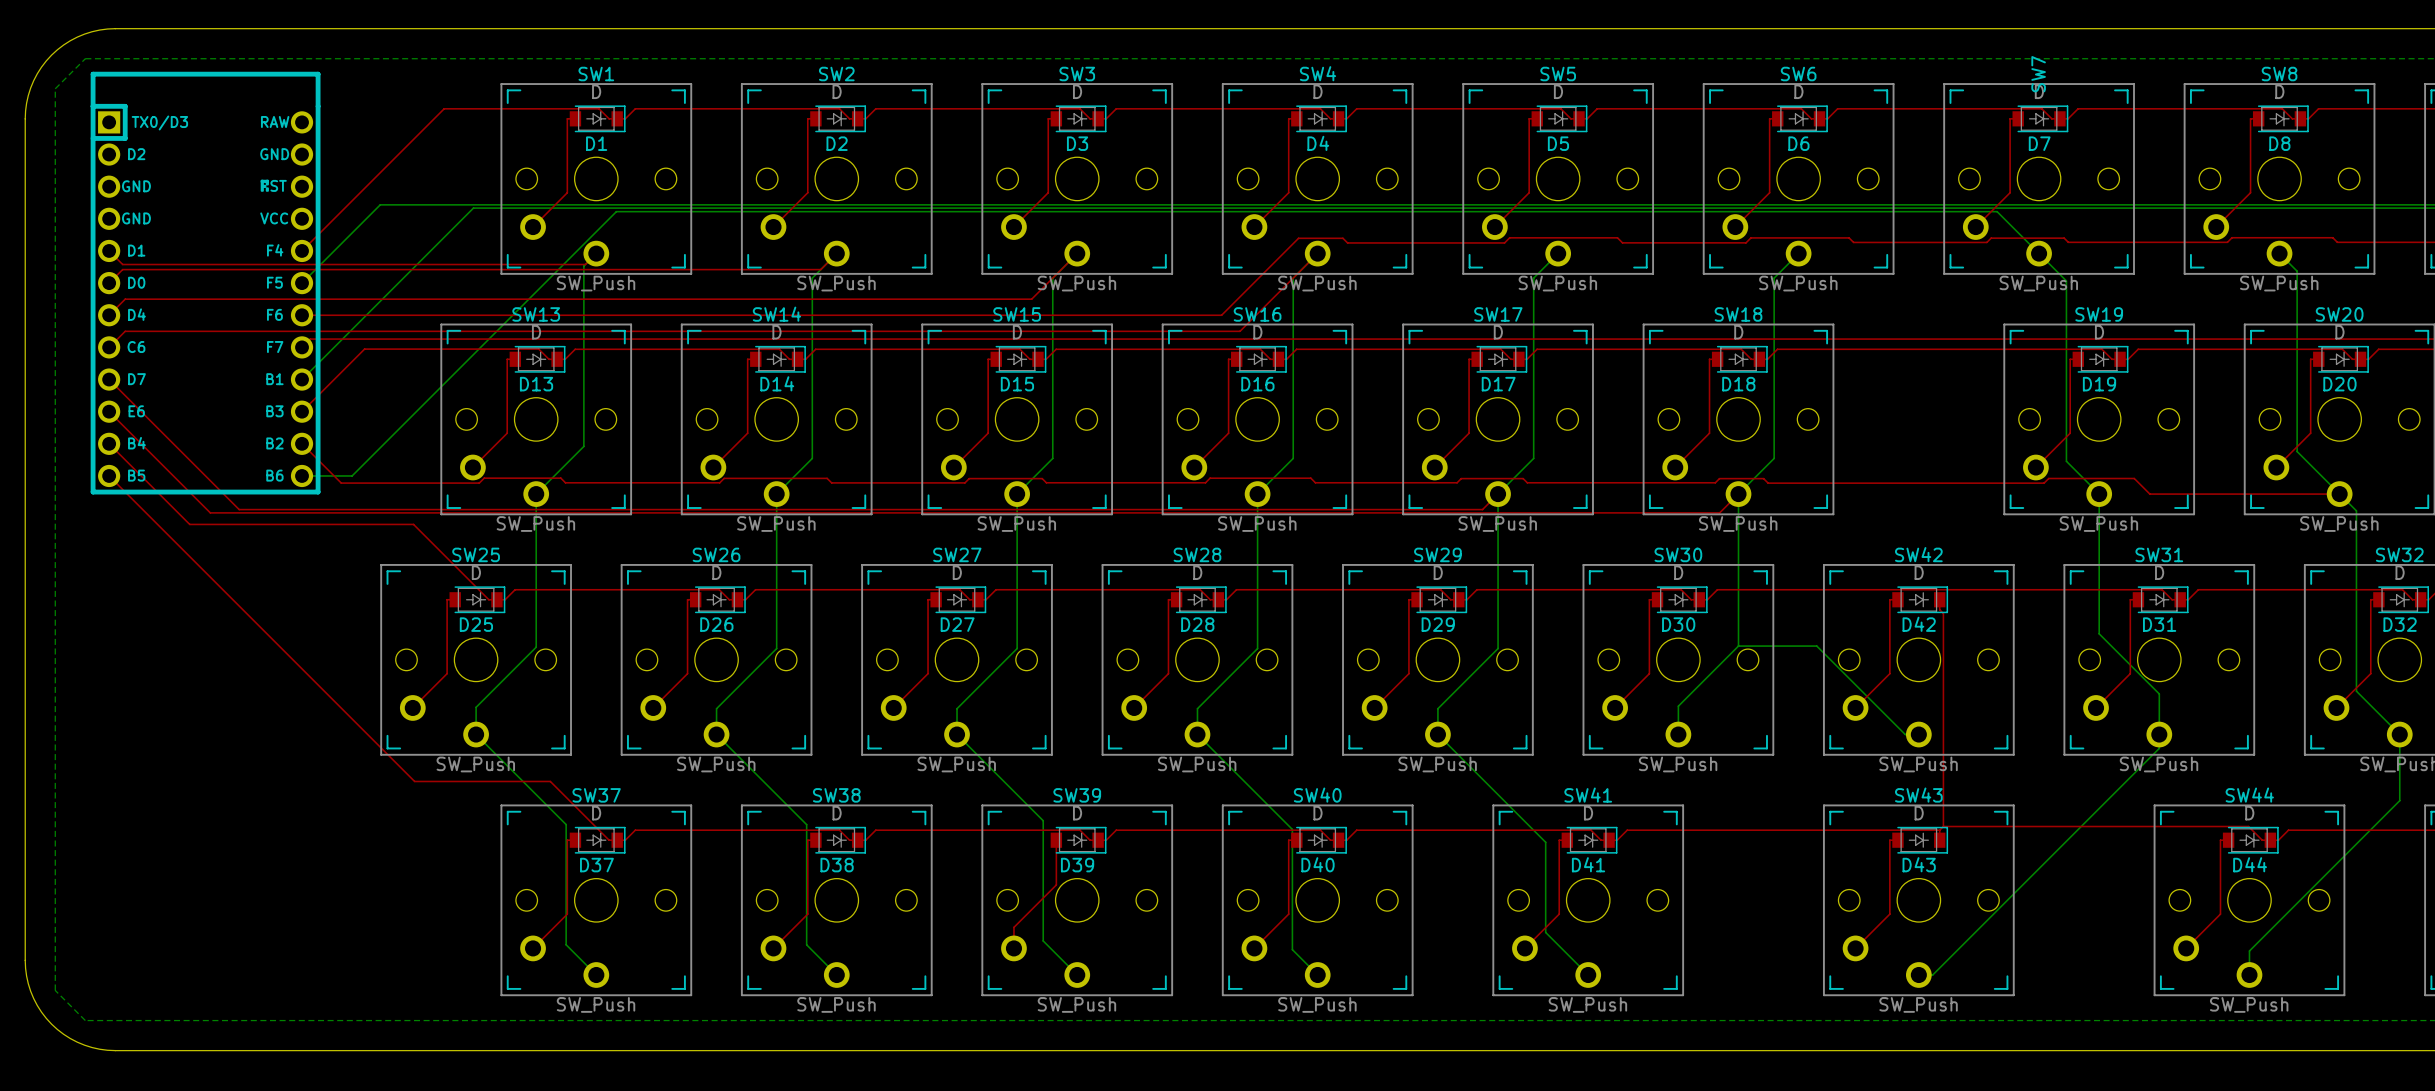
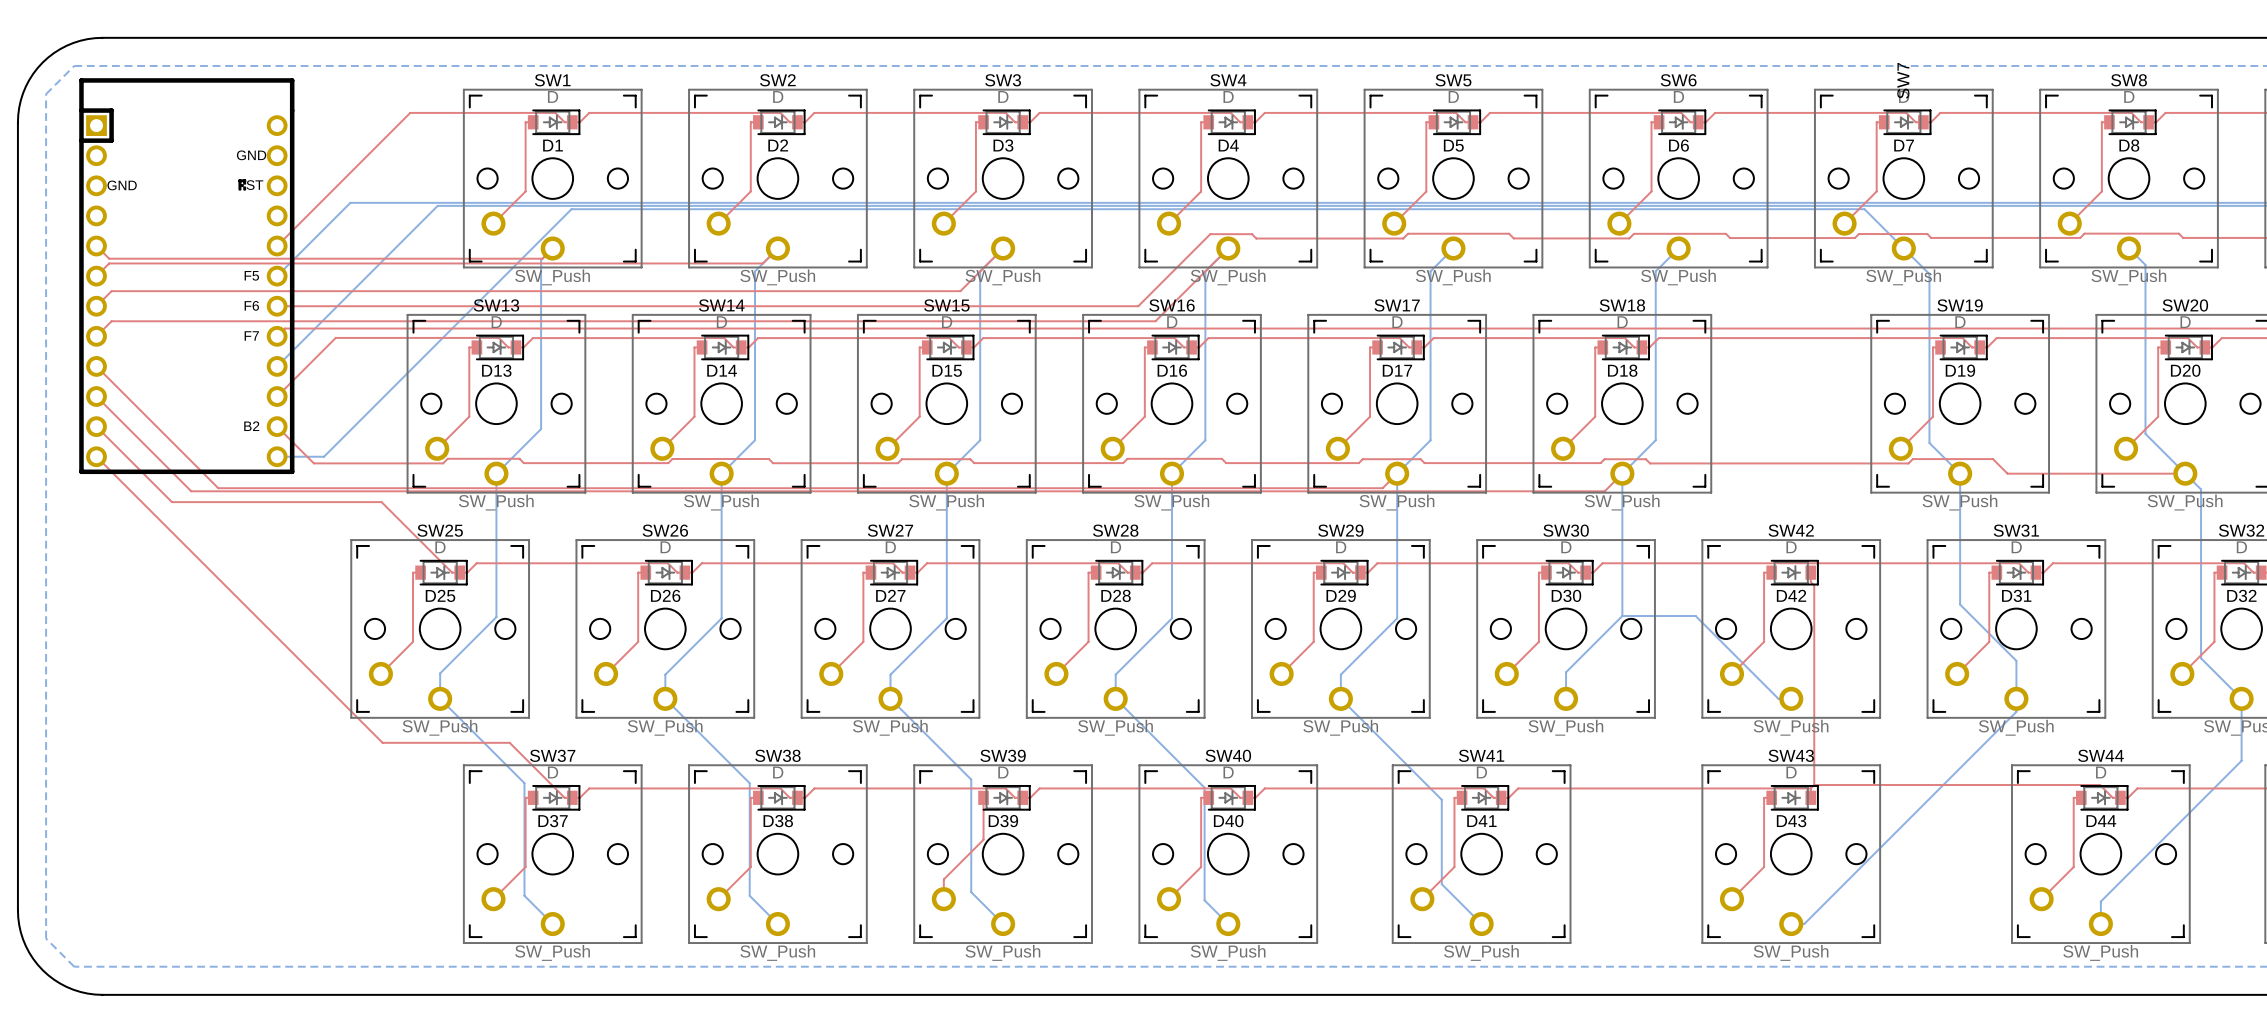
part footprint: [90, 71, 321, 495] -> [79, 78, 295, 475]

